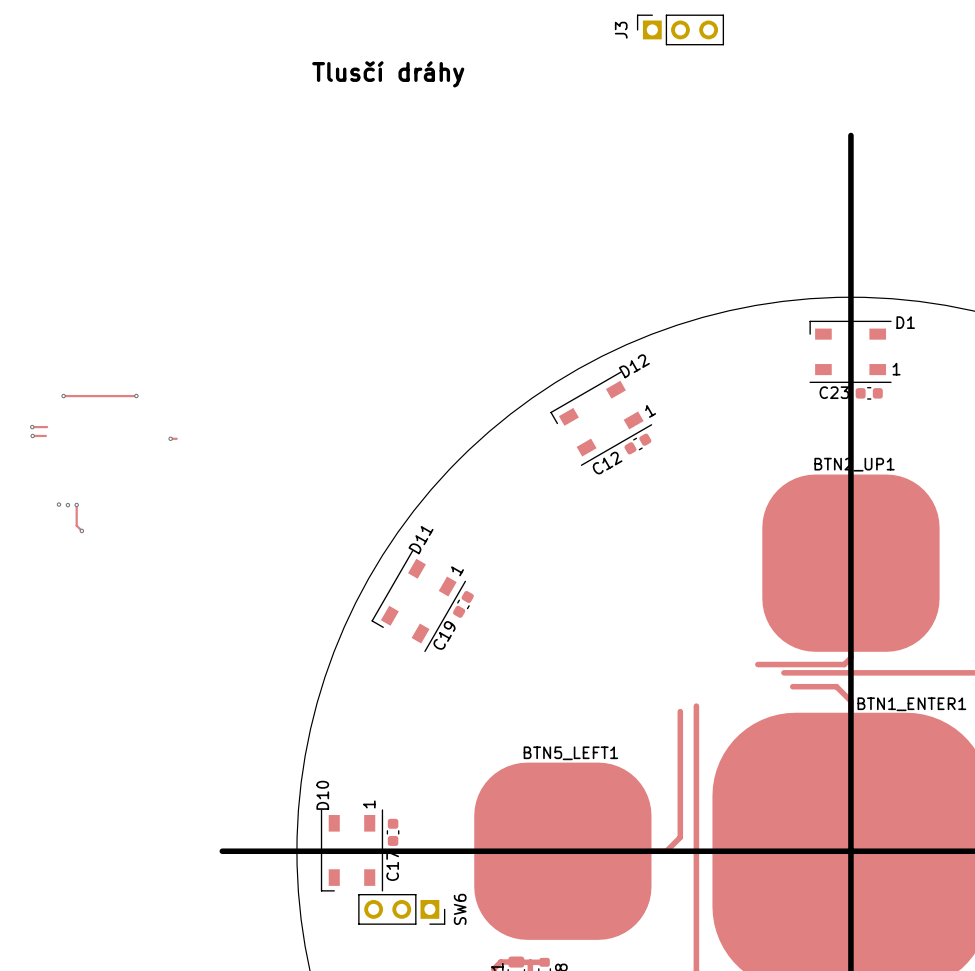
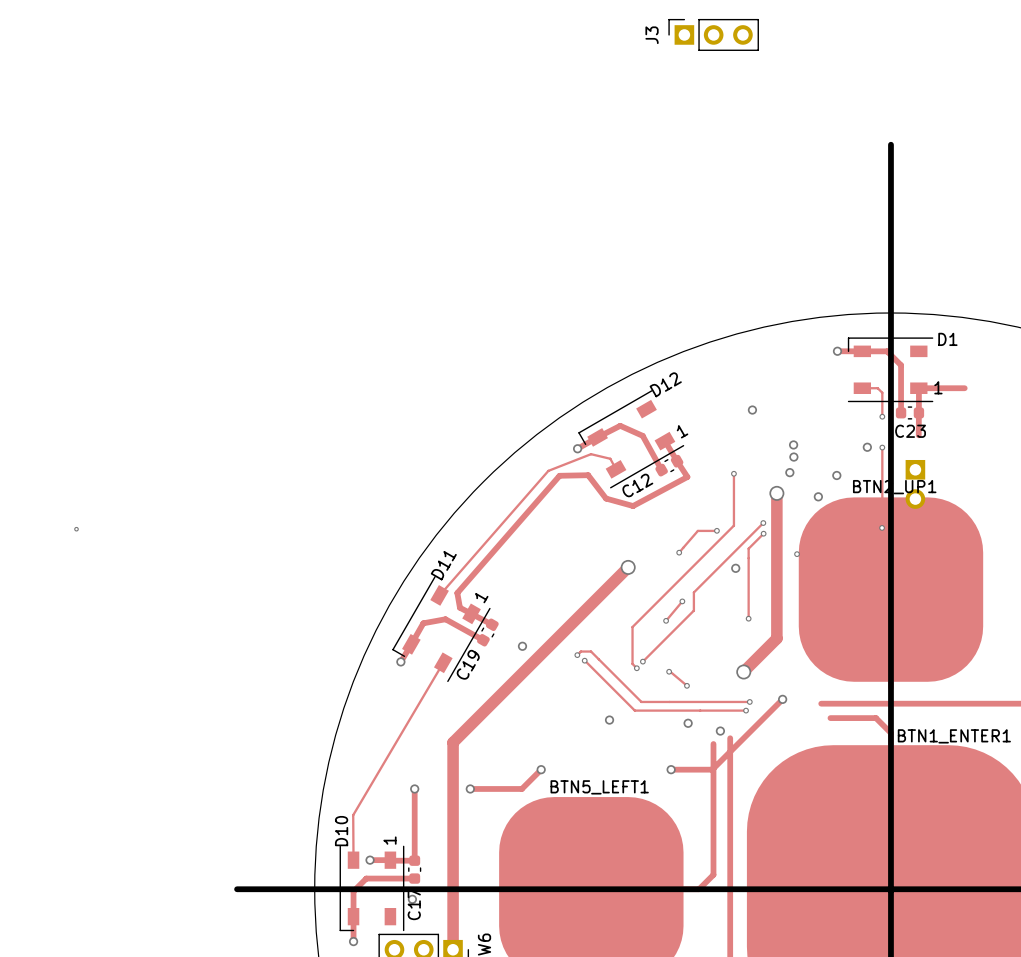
text: Tlusčí dráhy (388, 74) -> none
track: none -> (837, 351) (887, 351) (901, 365) (901, 412)
via: none -> (837, 351)
track: none -> (862, 388) (877, 388) (882, 392) (882, 416)
track: none -> (918, 388) (964, 388)
track: none -> (918, 388) (918, 435)
via: none -> (752, 410)
C23 name position: C23 (834, 392) -> C23 (910, 431)
via: (136, 395) -> none
track: (63, 396) (136, 396) -> none
via: (63, 396) -> none
via: none -> (882, 416)
track: none -> (664, 441) (687, 476) (633, 506) (606, 498) (588, 475) (559, 475) (457, 593) (459, 607) (492, 624)
via: none -> (793, 444)
via: none -> (867, 447)
track: none -> (882, 447) (882, 527)
via: none -> (882, 447)
track: (32, 427) (47, 427) -> none
via: (32, 427) -> none
track: none -> (577, 448) (620, 425) (642, 435) (661, 470)
via: none -> (577, 448)
track: (32, 435) (45, 435) -> none
via: (32, 435) -> none
via: none -> (793, 457)
track: (170, 438) (176, 438) -> none
via: (170, 438) -> none
track: none -> (616, 469) (610, 458) (591, 454) (548, 470) (439, 595)
via: none -> (789, 472)
track: none -> (733, 473) (733, 525) (632, 627) (632, 663) (636, 668)
via: none -> (733, 473)
via: none -> (836, 475)
part: none -> (915, 484)
track: none -> (776, 493) (776, 638) (743, 672)
via: none -> (776, 493)
via: none -> (818, 496)
track: none -> (763, 523) (693, 592) (693, 610) (642, 661)
via: none -> (763, 523)
via: none -> (882, 527)
via: (58, 504) -> none
track: (76, 504) (76, 525) (81, 530) -> none
via: (76, 504) -> none
track: none -> (716, 530) (697, 530) (679, 552)
via: none -> (716, 530)
track: none -> (763, 533) (748, 548) (748, 618)
via: none -> (763, 533)
via: none -> (679, 552)
via: none -> (797, 554)
via: (81, 530) -> none
track: none -> (628, 567) (453, 742) (453, 950)
via: none -> (628, 567)
via: none -> (735, 568)
track: none -> (682, 601) (666, 620)
via: none -> (682, 601)
via: none -> (748, 618)
via: none -> (666, 620)
track: none -> (483, 640) (445, 619) (423, 623) (400, 661)
via: none -> (522, 646)
track: none -> (577, 655) (580, 651) (591, 651) (641, 701) (749, 701)
via: none -> (577, 655)
track: none -> (584, 660) (634, 710) (746, 710)
via: none -> (584, 660)
via: none -> (400, 661)
via: none -> (642, 661)
track: none -> (443, 662) (353, 815) (353, 860)
via: none -> (636, 668)
track: none -> (669, 671) (686, 685)
via: none -> (669, 671)
via: none -> (743, 672)
via: none -> (686, 685)
track: (850, 657) (844, 664) (757, 664) -> none
track: none -> (782, 699) (712, 769) (671, 769)
via: none -> (782, 699)
via: none -> (749, 701)
via: none -> (746, 710)
via: none -> (609, 720)
via: none -> (688, 723)
via: none -> (720, 731)
track: none -> (541, 769) (521, 788) (470, 788)
via: none -> (541, 769)
via: none -> (671, 769)
track: none -> (414, 788) (414, 860) (370, 860)
via: none -> (414, 788)
via: none -> (470, 788)
via: none -> (370, 860)
track: none -> (414, 878) (366, 878) (353, 891) (353, 941)
via: none -> (412, 899)
via: none -> (353, 941)

